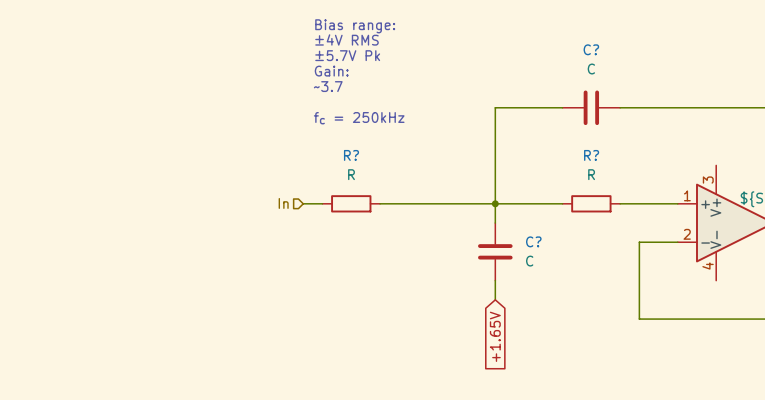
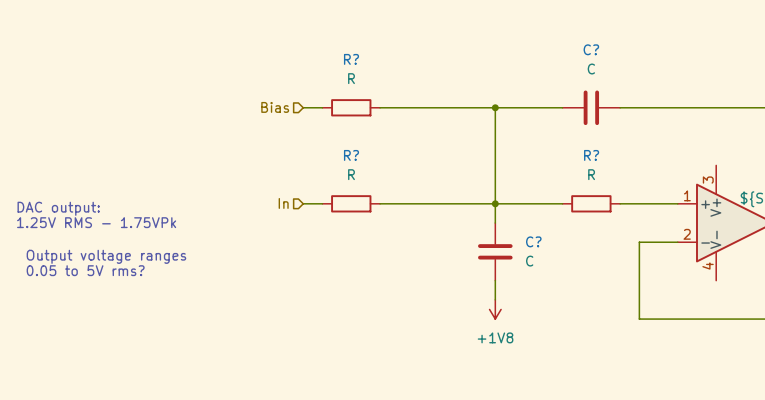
text: Bias range: (355, 26) -> none
text: ±4V RMS (346, 39) -> none
text: ±5.7V Pk (347, 55) -> none
text: Gain: (331, 71) -> none
text: ~3.7 (328, 86) -> none
hierarchical label: none -> Bias (275, 107)
wire: none -> (303, 107) (322, 107)
R?: none -> R (351, 107)
wire: none -> (380, 107) (495, 107)
junction: none -> (495, 107)
text: fc = 250kHz (359, 118) -> none
text: none -> DAC output: (58, 208)
text: none -> 1.25V RMS - 1.75VPk (96, 222)
text: none -> Output voltage ranges (106, 256)
text: none -> 0.05 to 5V rms? (85, 270)
power symbol: none -> +1V8 (495, 309)
global label: +1.65V (495, 336) -> none

